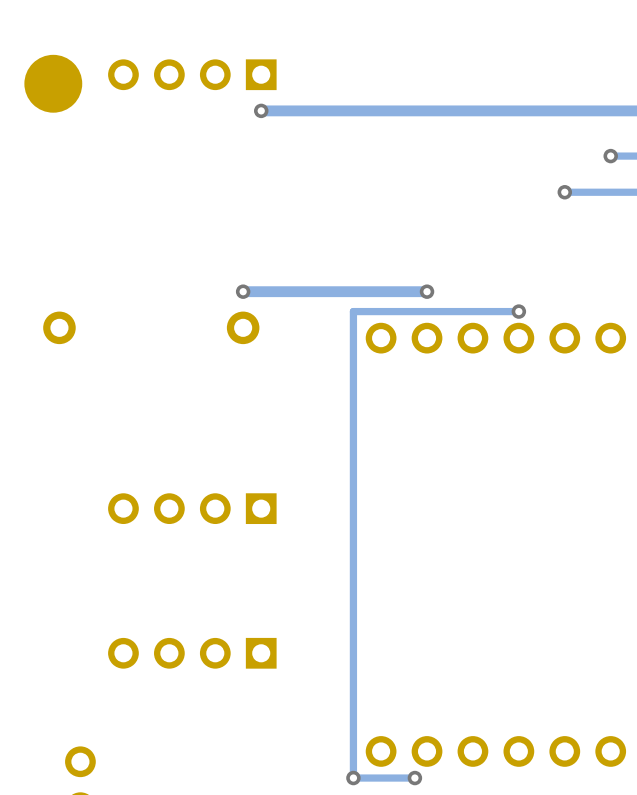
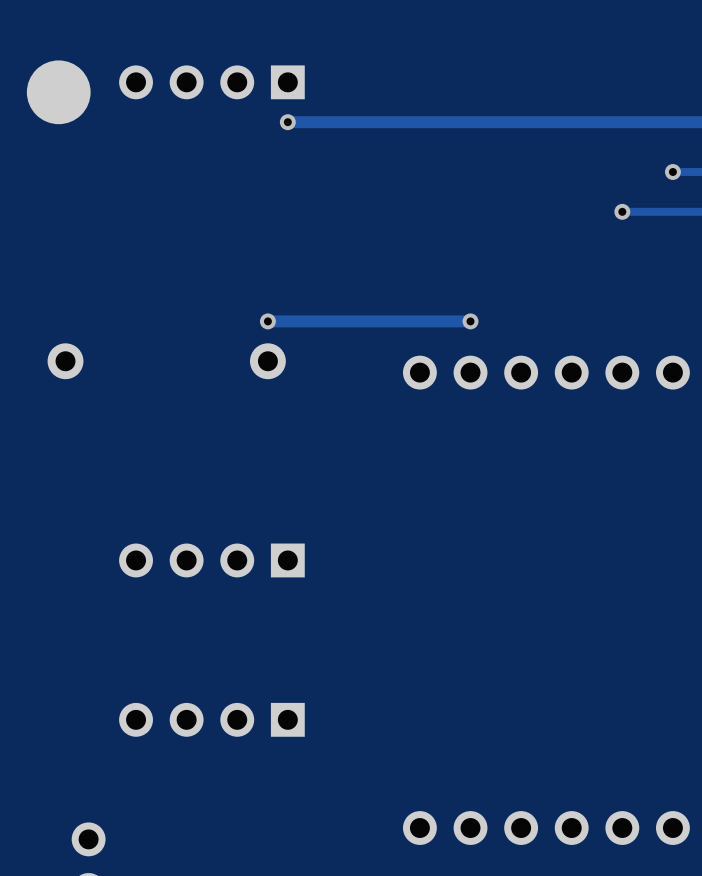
track: (518, 311) (353, 311) (353, 778) (414, 778) -> none
via: (518, 311) -> none
via: (353, 778) -> none
via: (414, 778) -> none

